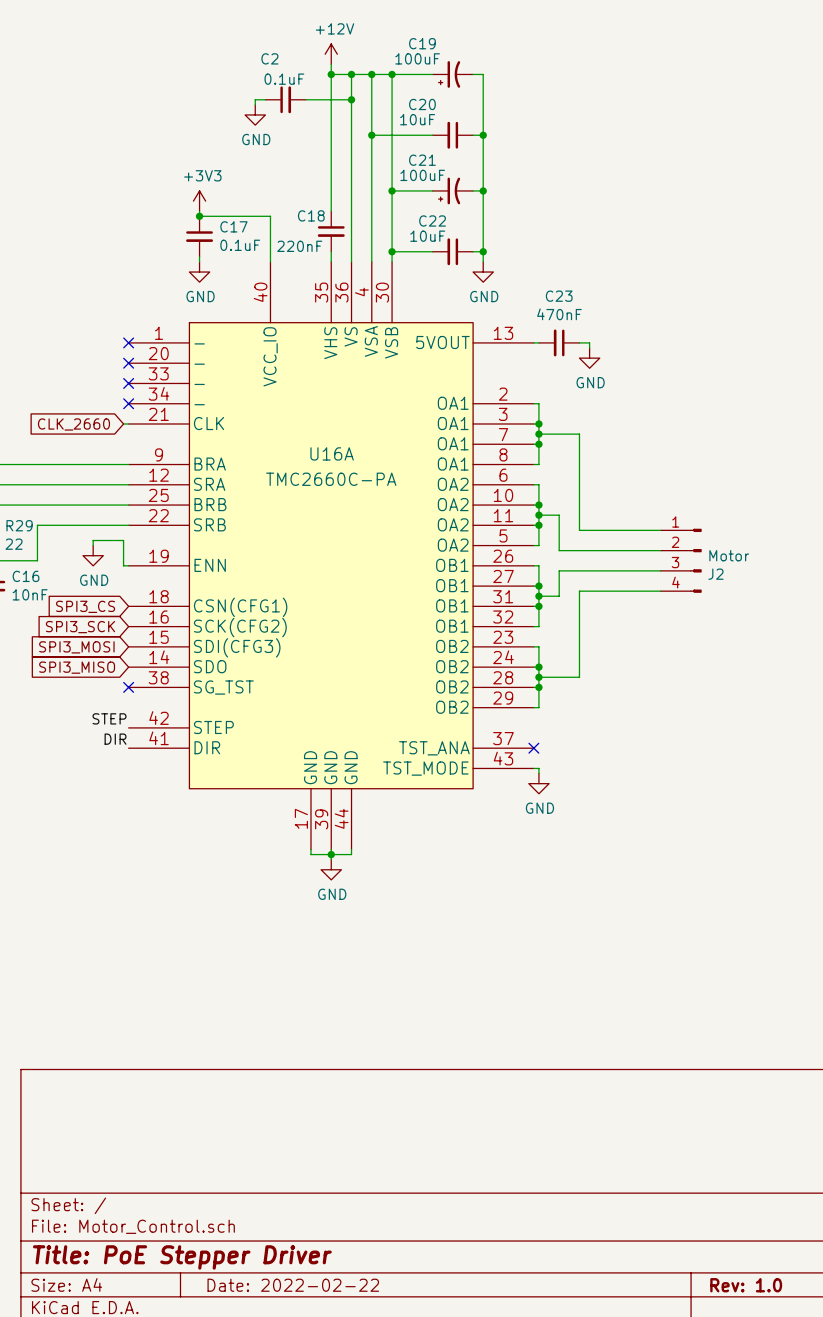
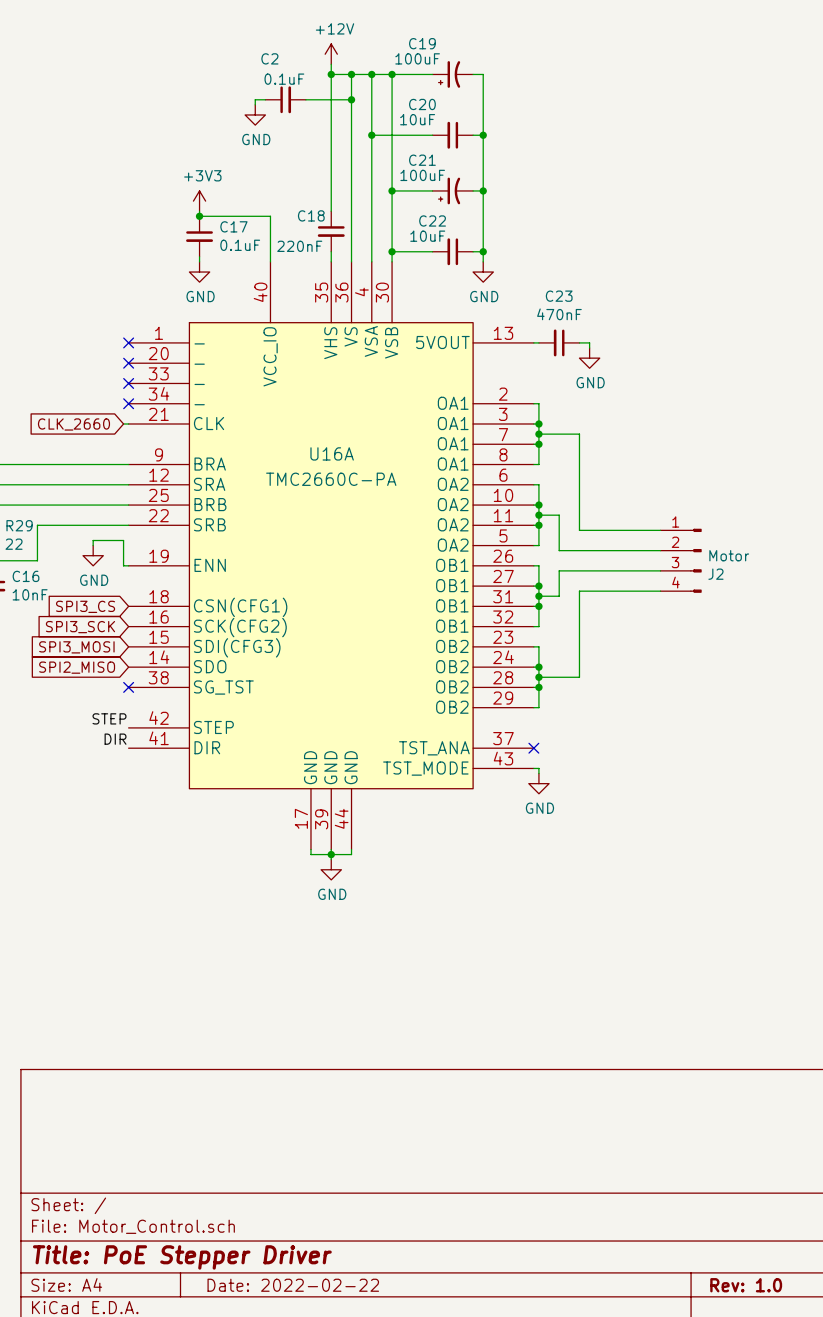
global label: SPI3_MISO (77, 667) -> SPI2_MISO (77, 667)

